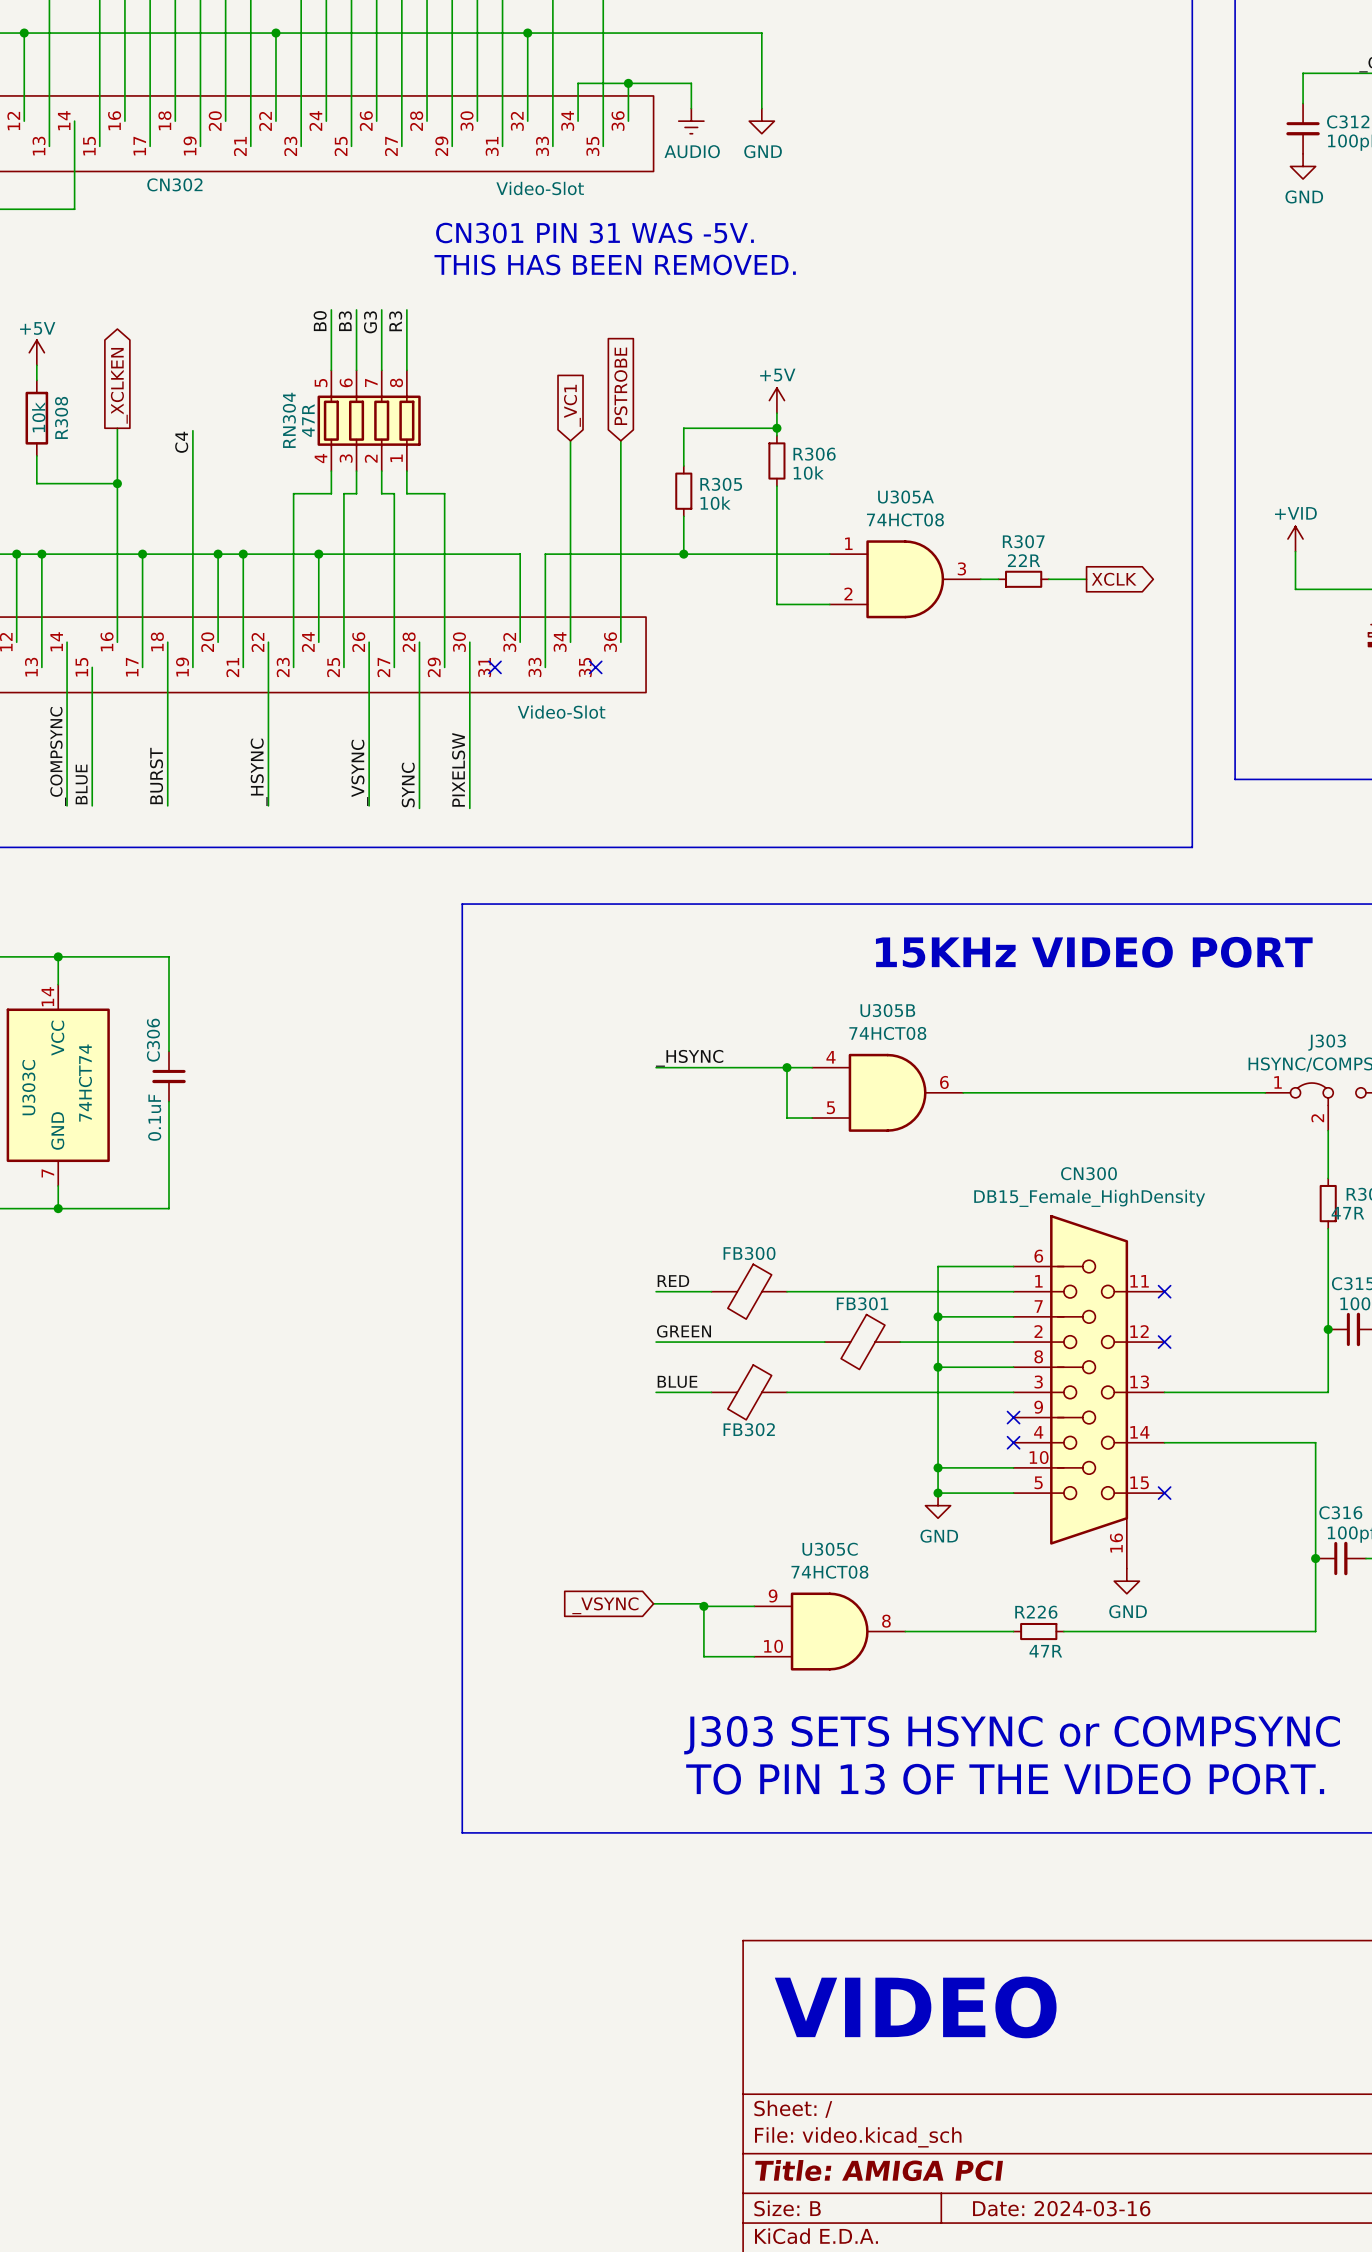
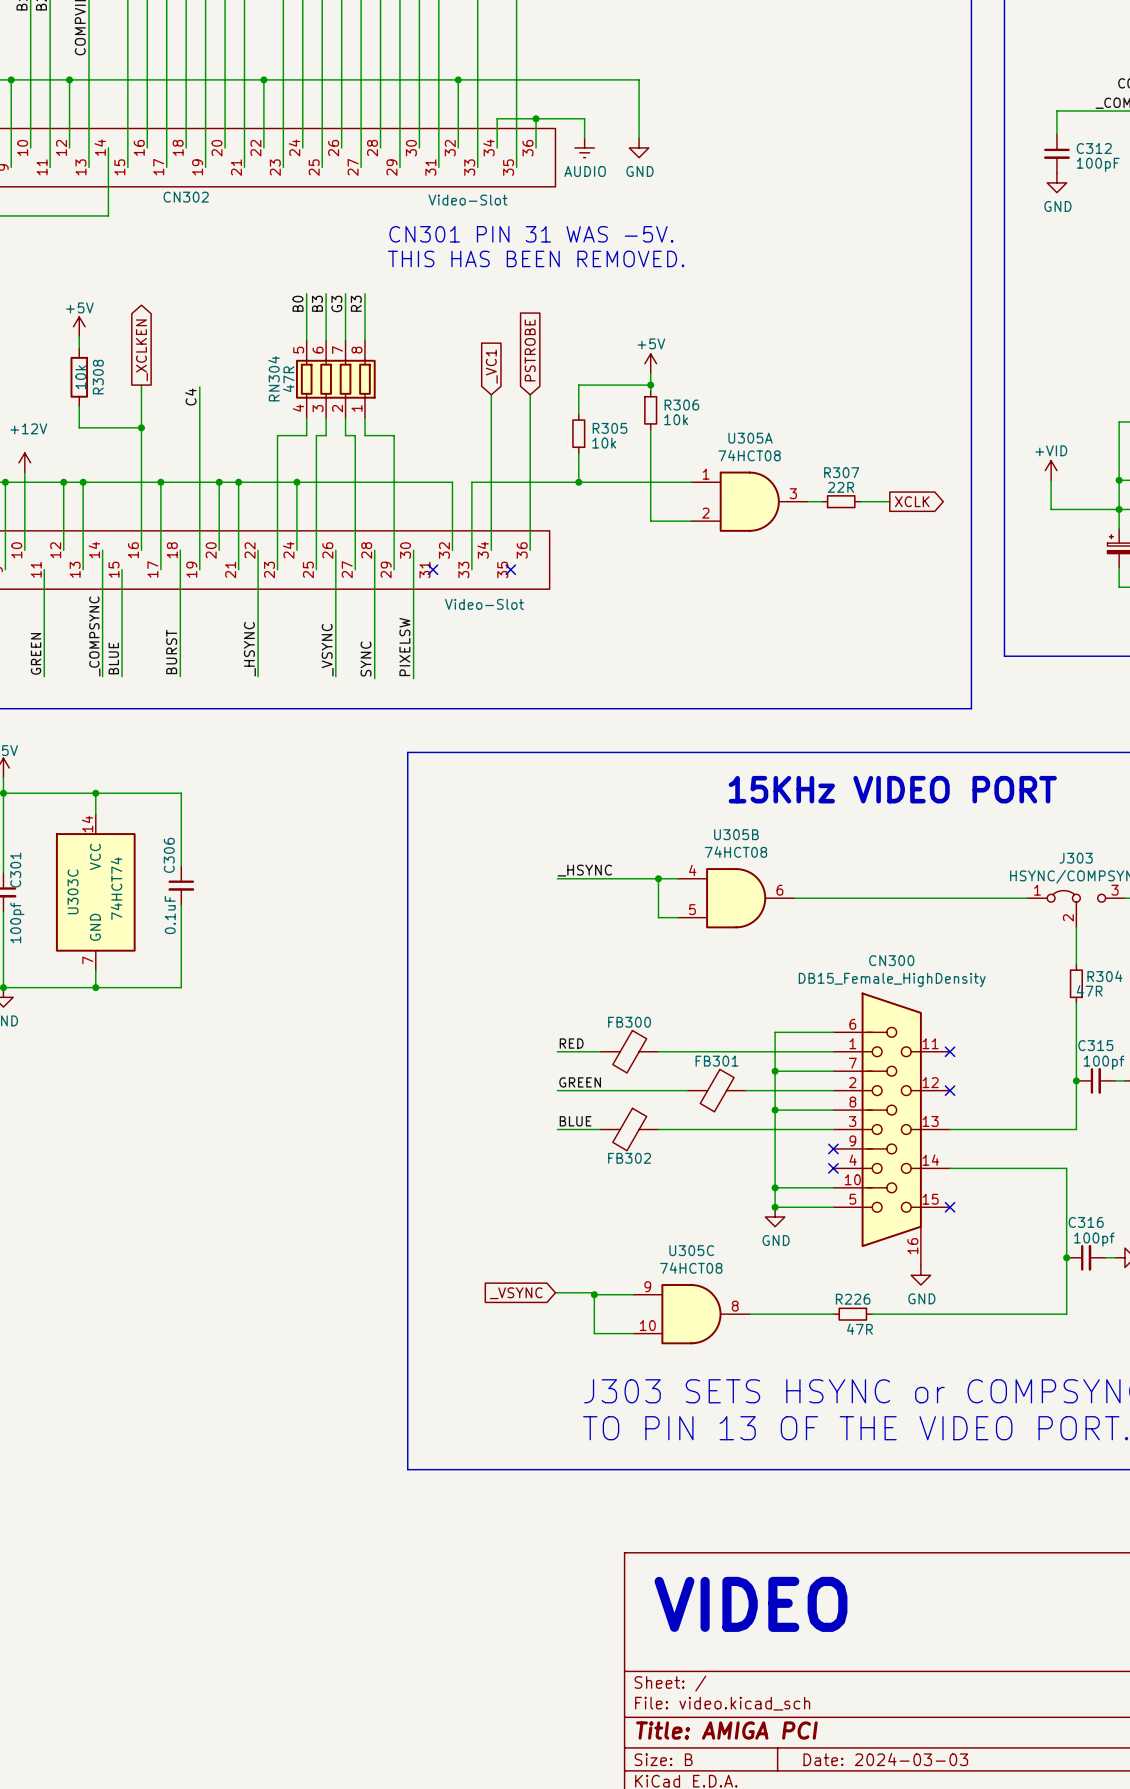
title block: Date: 2024-03-16 (1061, 2208) -> Date: 2024-03-03 (885, 1759)

